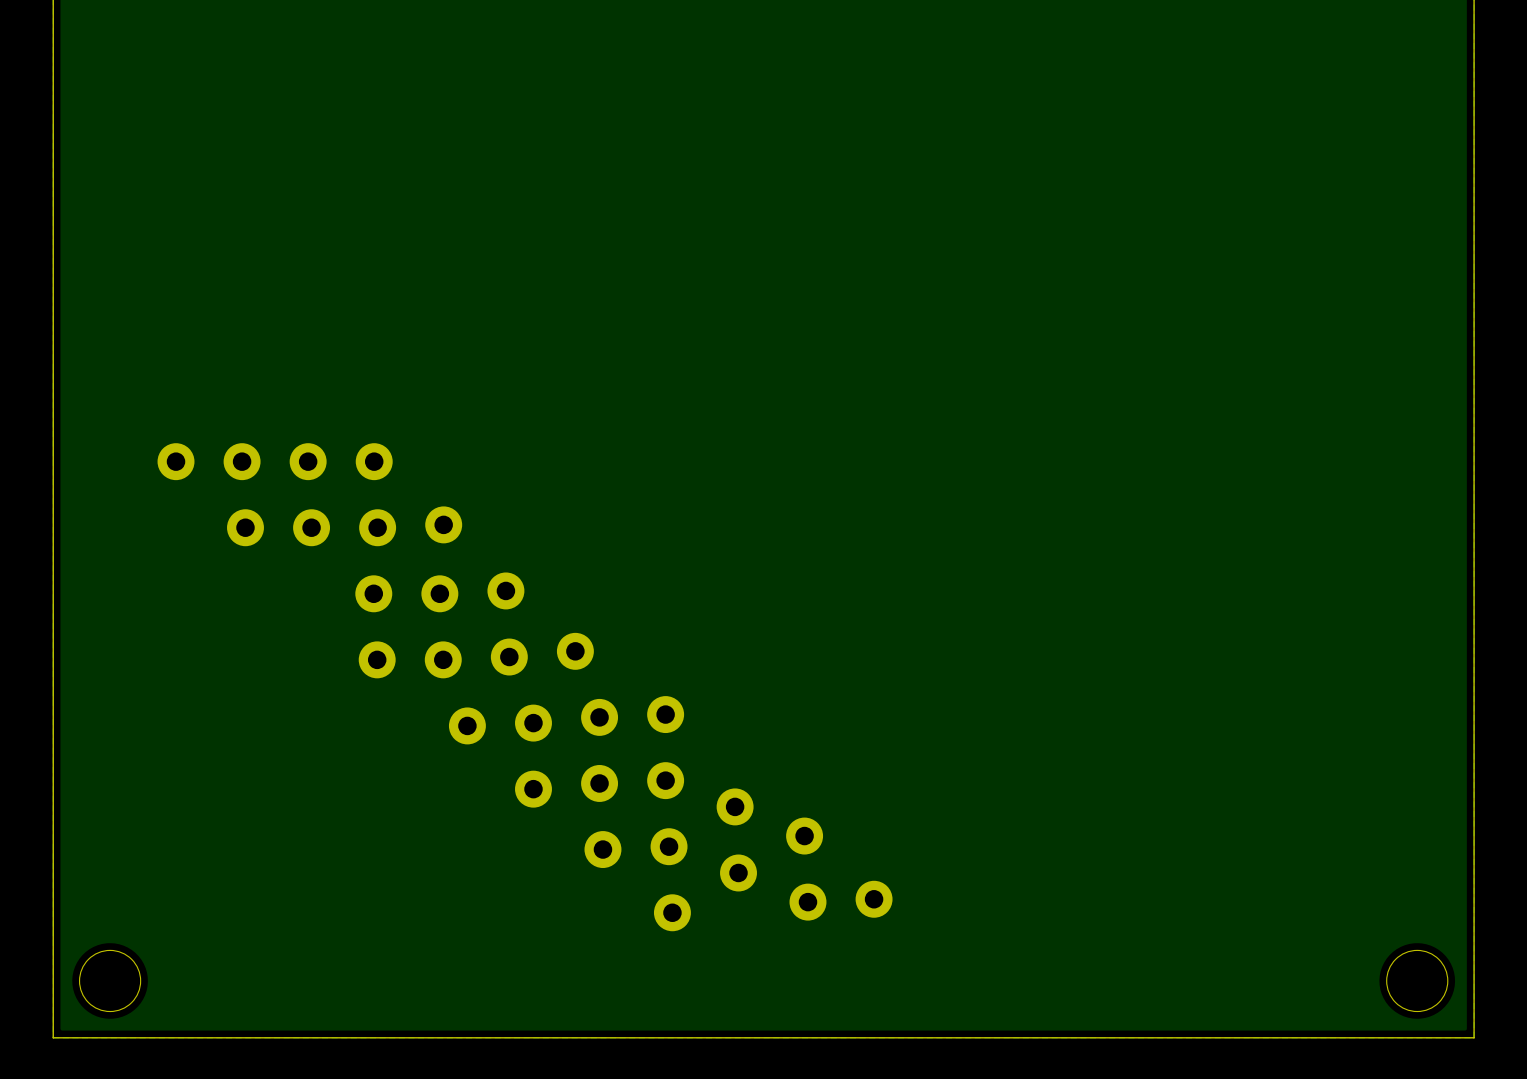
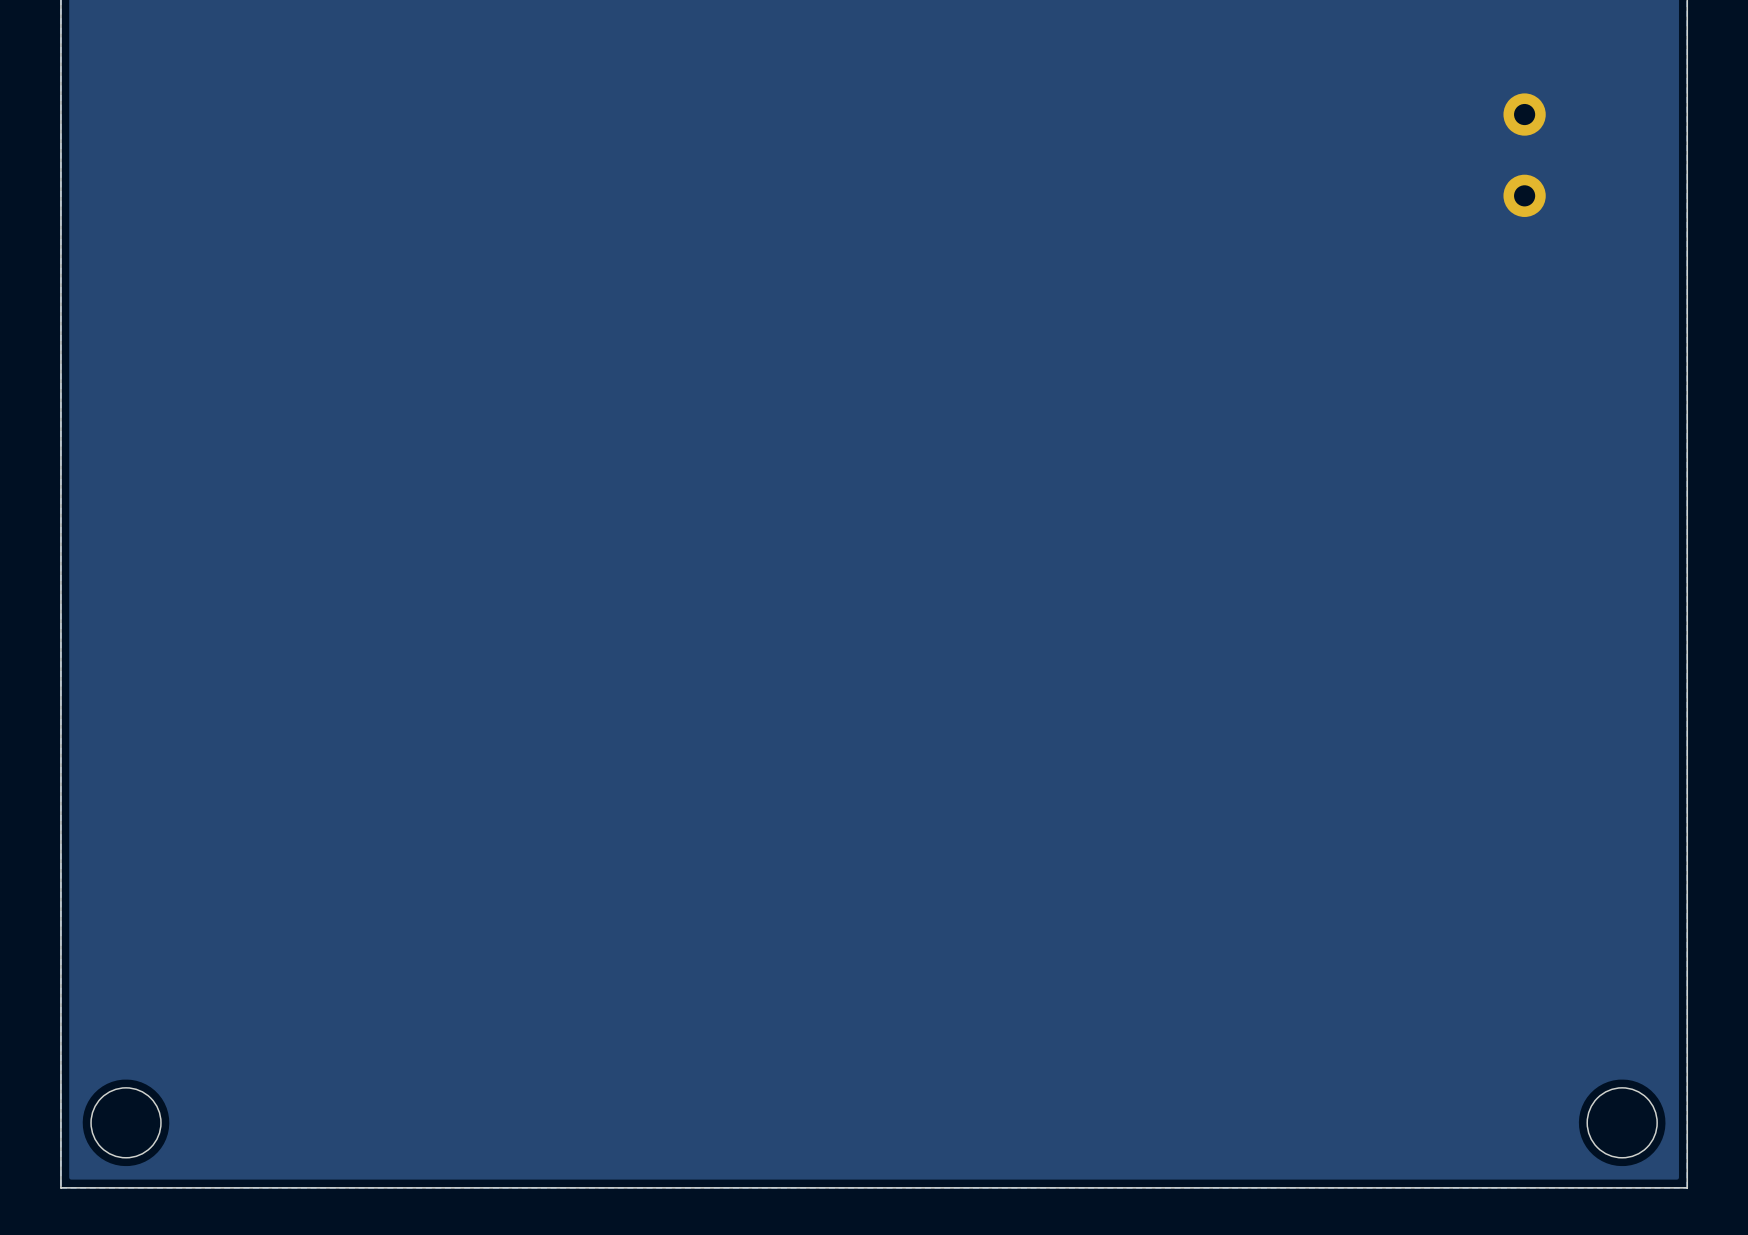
part: none -> (1524, 114)
part: none -> (1524, 195)
part: (176, 461) -> none
part: (242, 461) -> none
part: (308, 461) -> none
part: (374, 461) -> none
part: (443, 524) -> none
part: (245, 527) -> none
part: (311, 527) -> none
part: (377, 527) -> none
part: (505, 590) -> none
part: (373, 593) -> none
part: (439, 593) -> none
part: (575, 651) -> none
part: (509, 657) -> none
part: (377, 659) -> none
part: (443, 659) -> none
part: (665, 714) -> none
part: (599, 717) -> none
part: (533, 723) -> none
part: (467, 725) -> none
part: (665, 780) -> none
part: (599, 783) -> none
part: (533, 789) -> none
part: (735, 806) -> none
part: (804, 836) -> none
part: (669, 846) -> none
part: (602, 849) -> none
part: (738, 872) -> none
part: (874, 899) -> none
part: (807, 902) -> none
part: (672, 912) -> none

